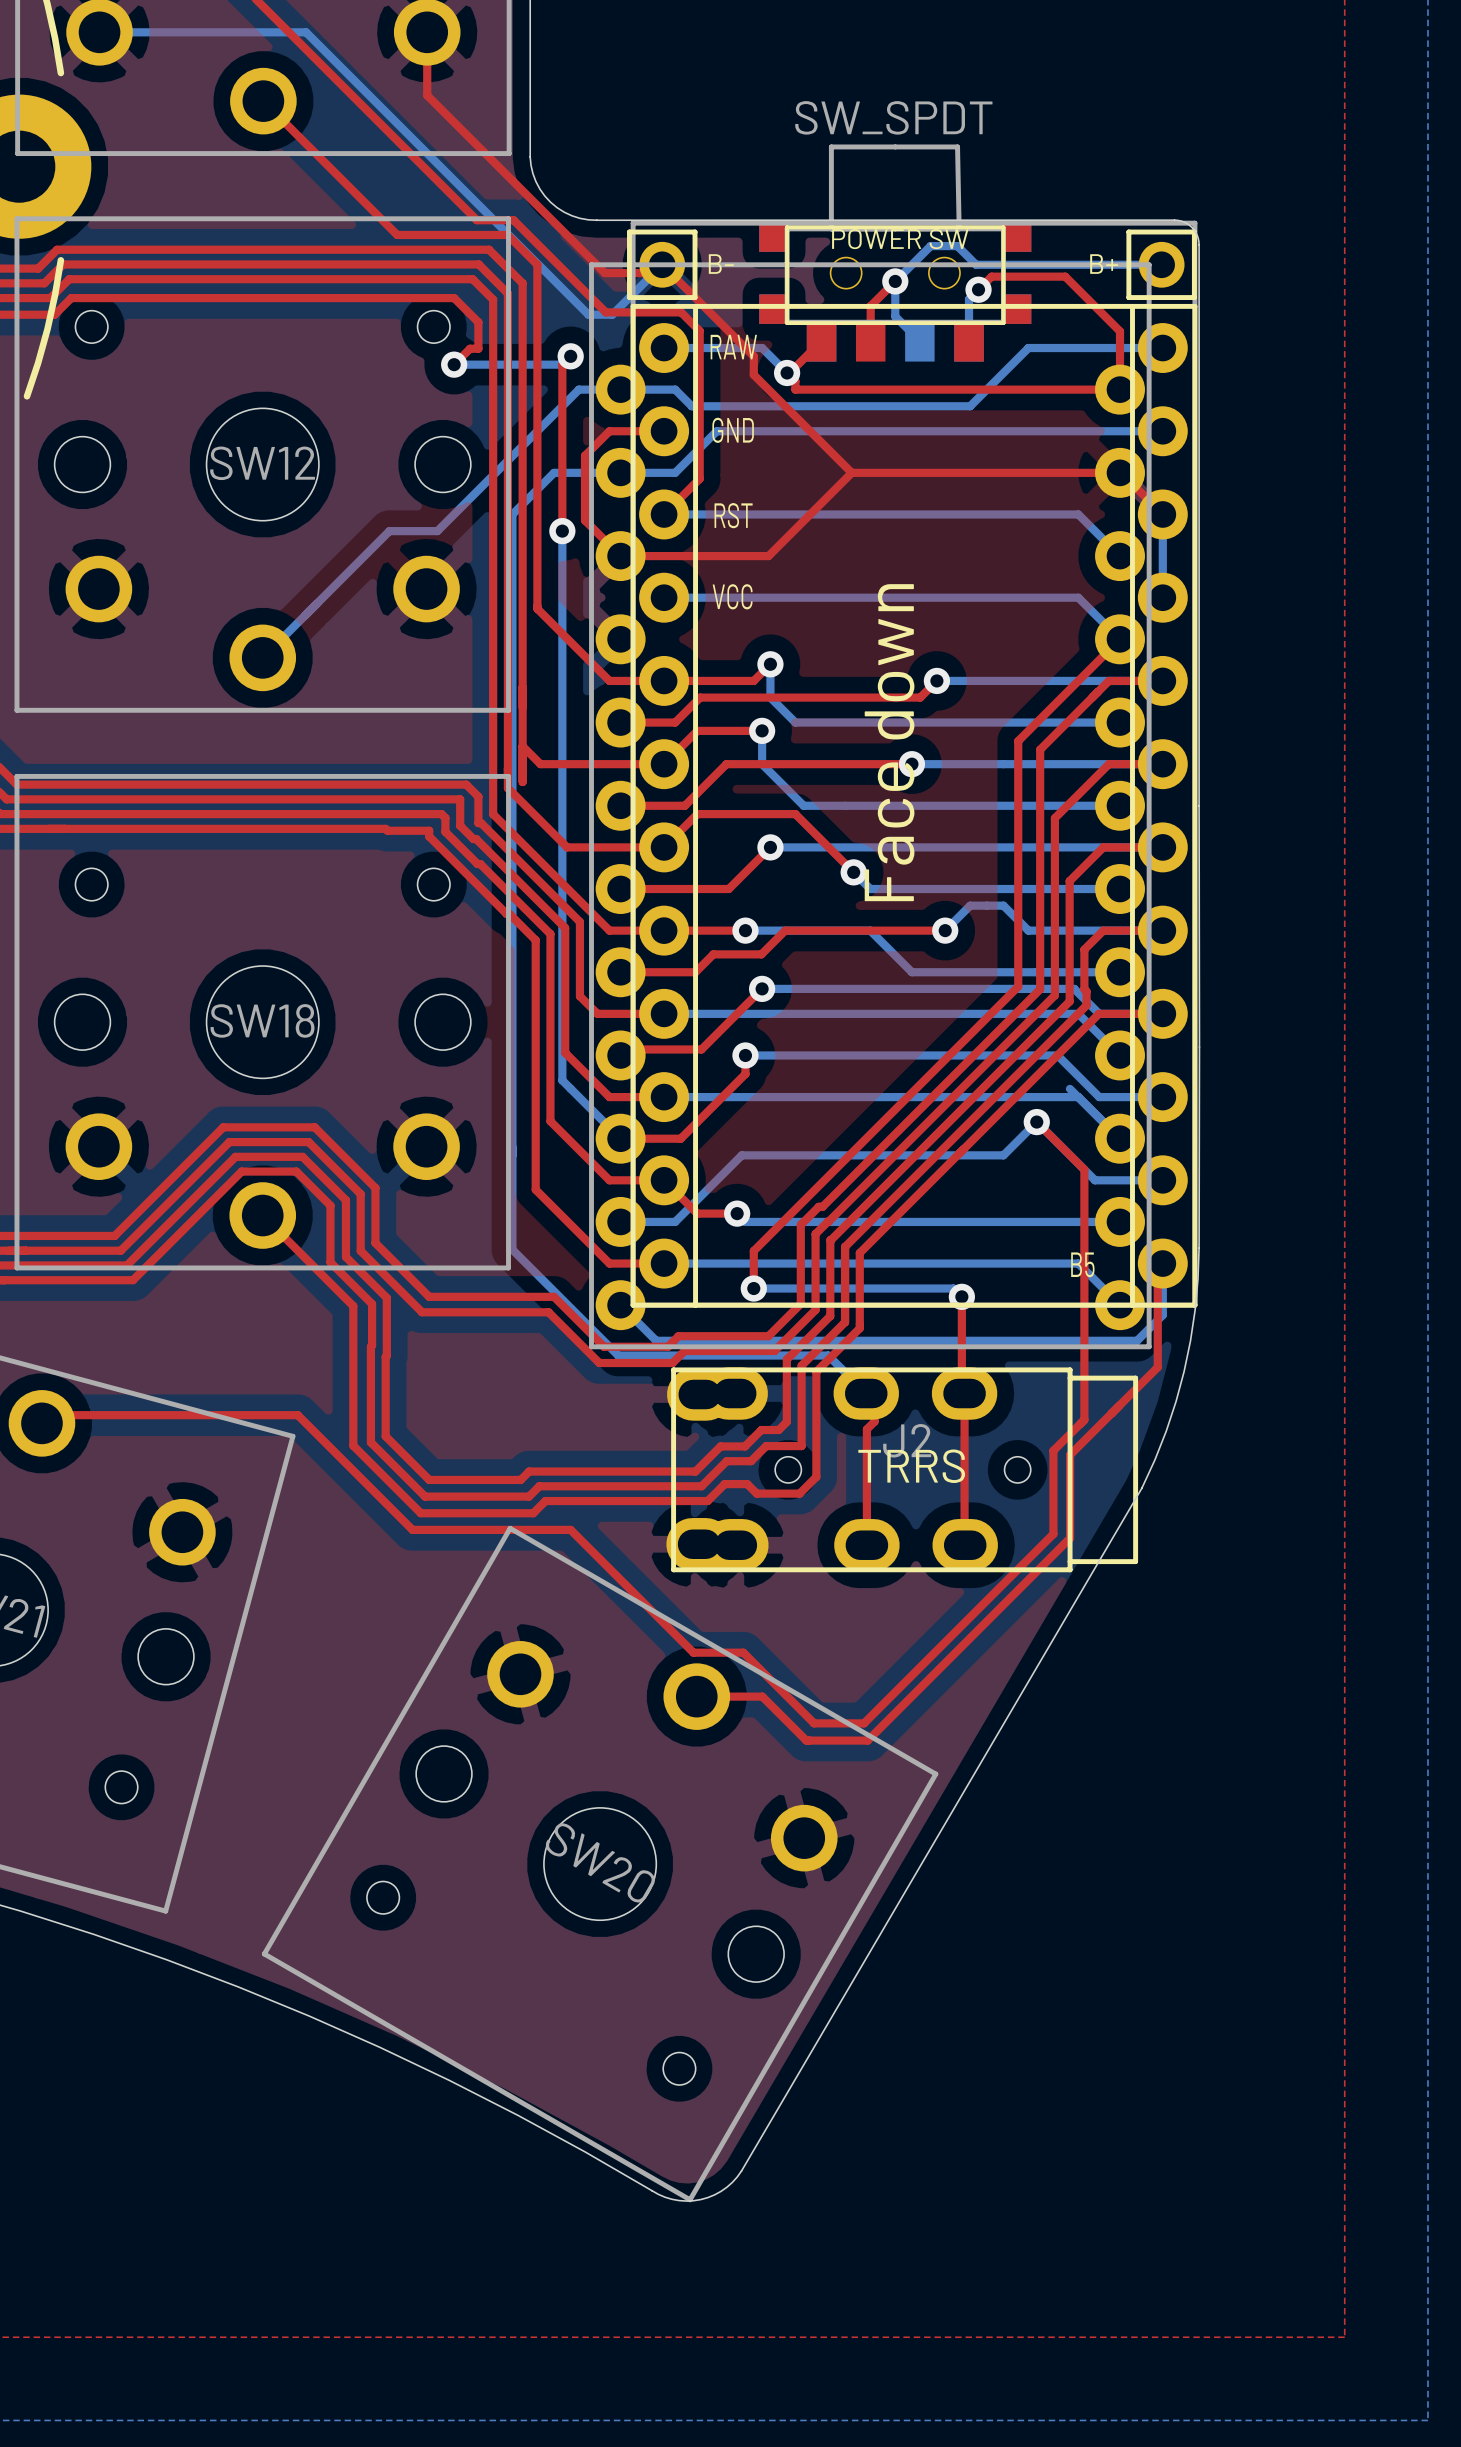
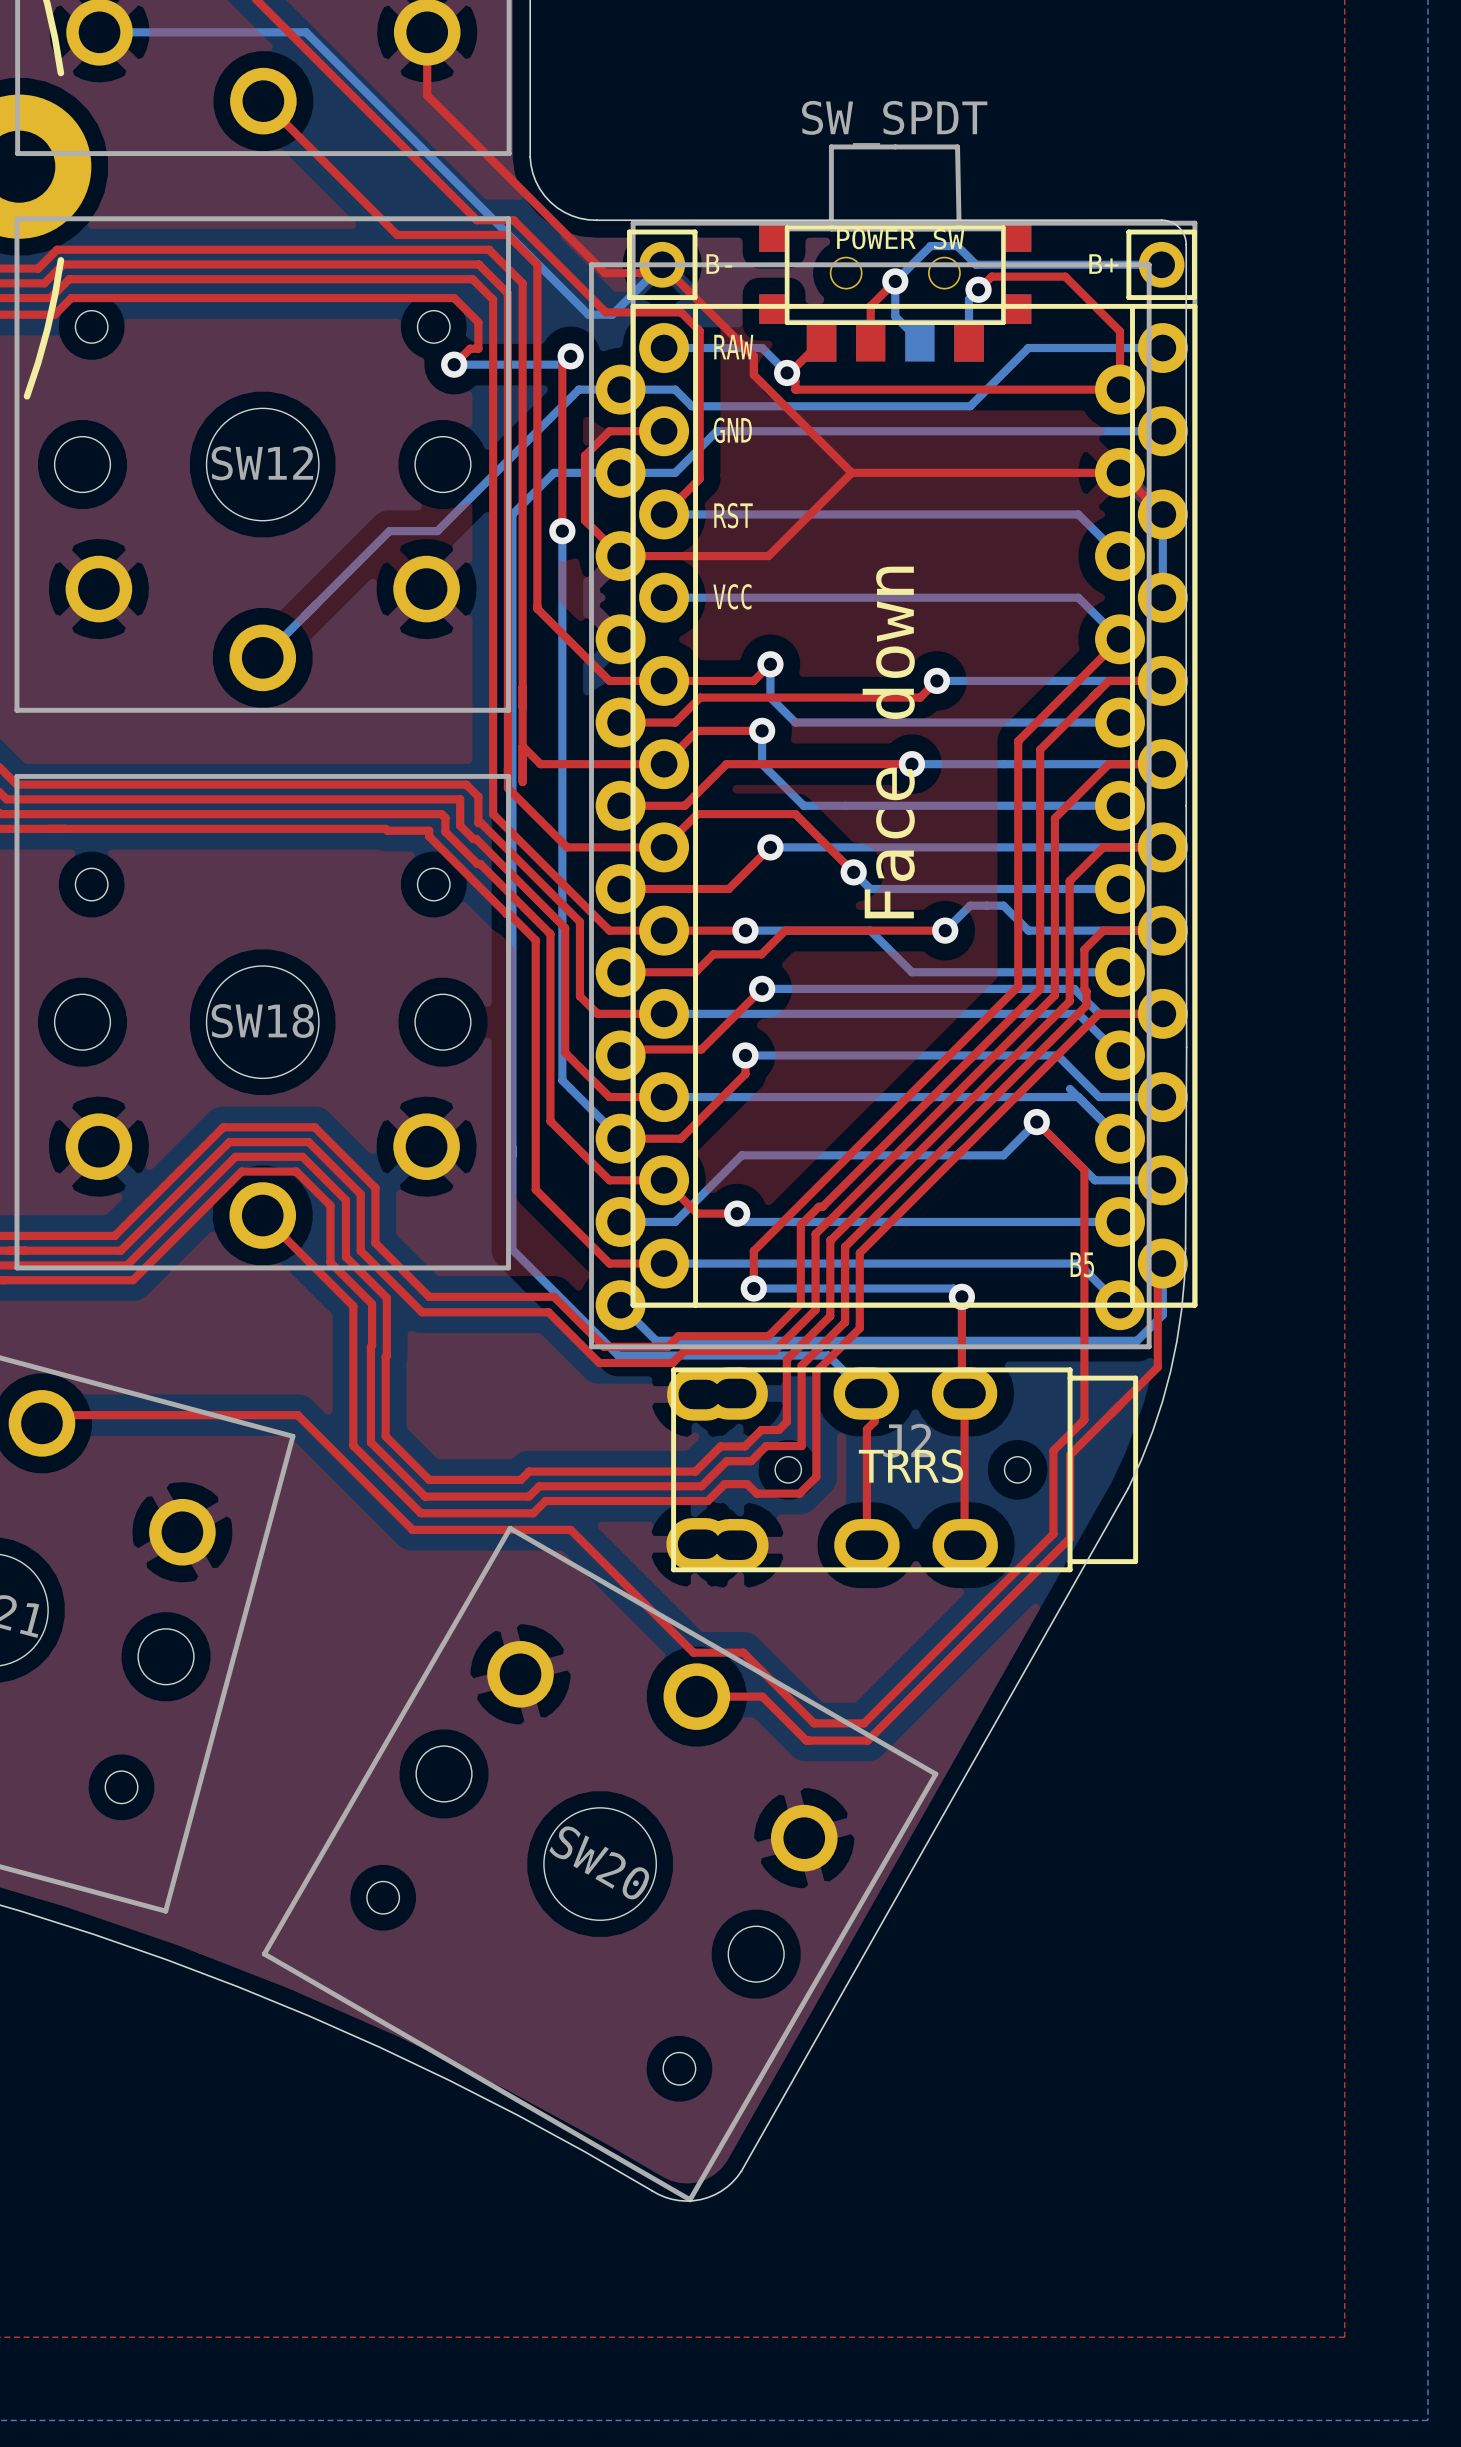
board edge: (1161, 220) (1177, 220) (1186, 223) (1195, 232) (1199, 244) (1199, 1248) (1195, 1310) (1184, 1371) (1166, 1431) (1141, 1488) (741, 2171) -> (1161, 220) (1171, 222) (1179, 227) (1184, 235) (1186, 244) (1185, 1248) (1181, 1310) (1170, 1371) (1152, 1431) (1128, 1488) (741, 2171)

